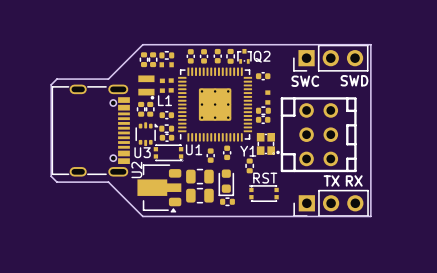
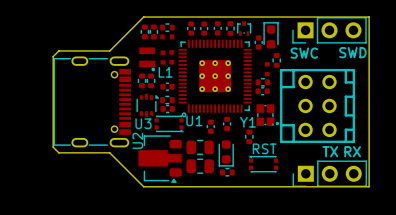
Q2 name: Q2 (262, 56) -> none
part: none -> (271, 35)
U1 footprint: [178, 67, 253, 142] -> [178, 39, 252, 117]
part rotation: 0° (263, 76) -> 90° clockwise (258, 42)
part: none -> (276, 60)

